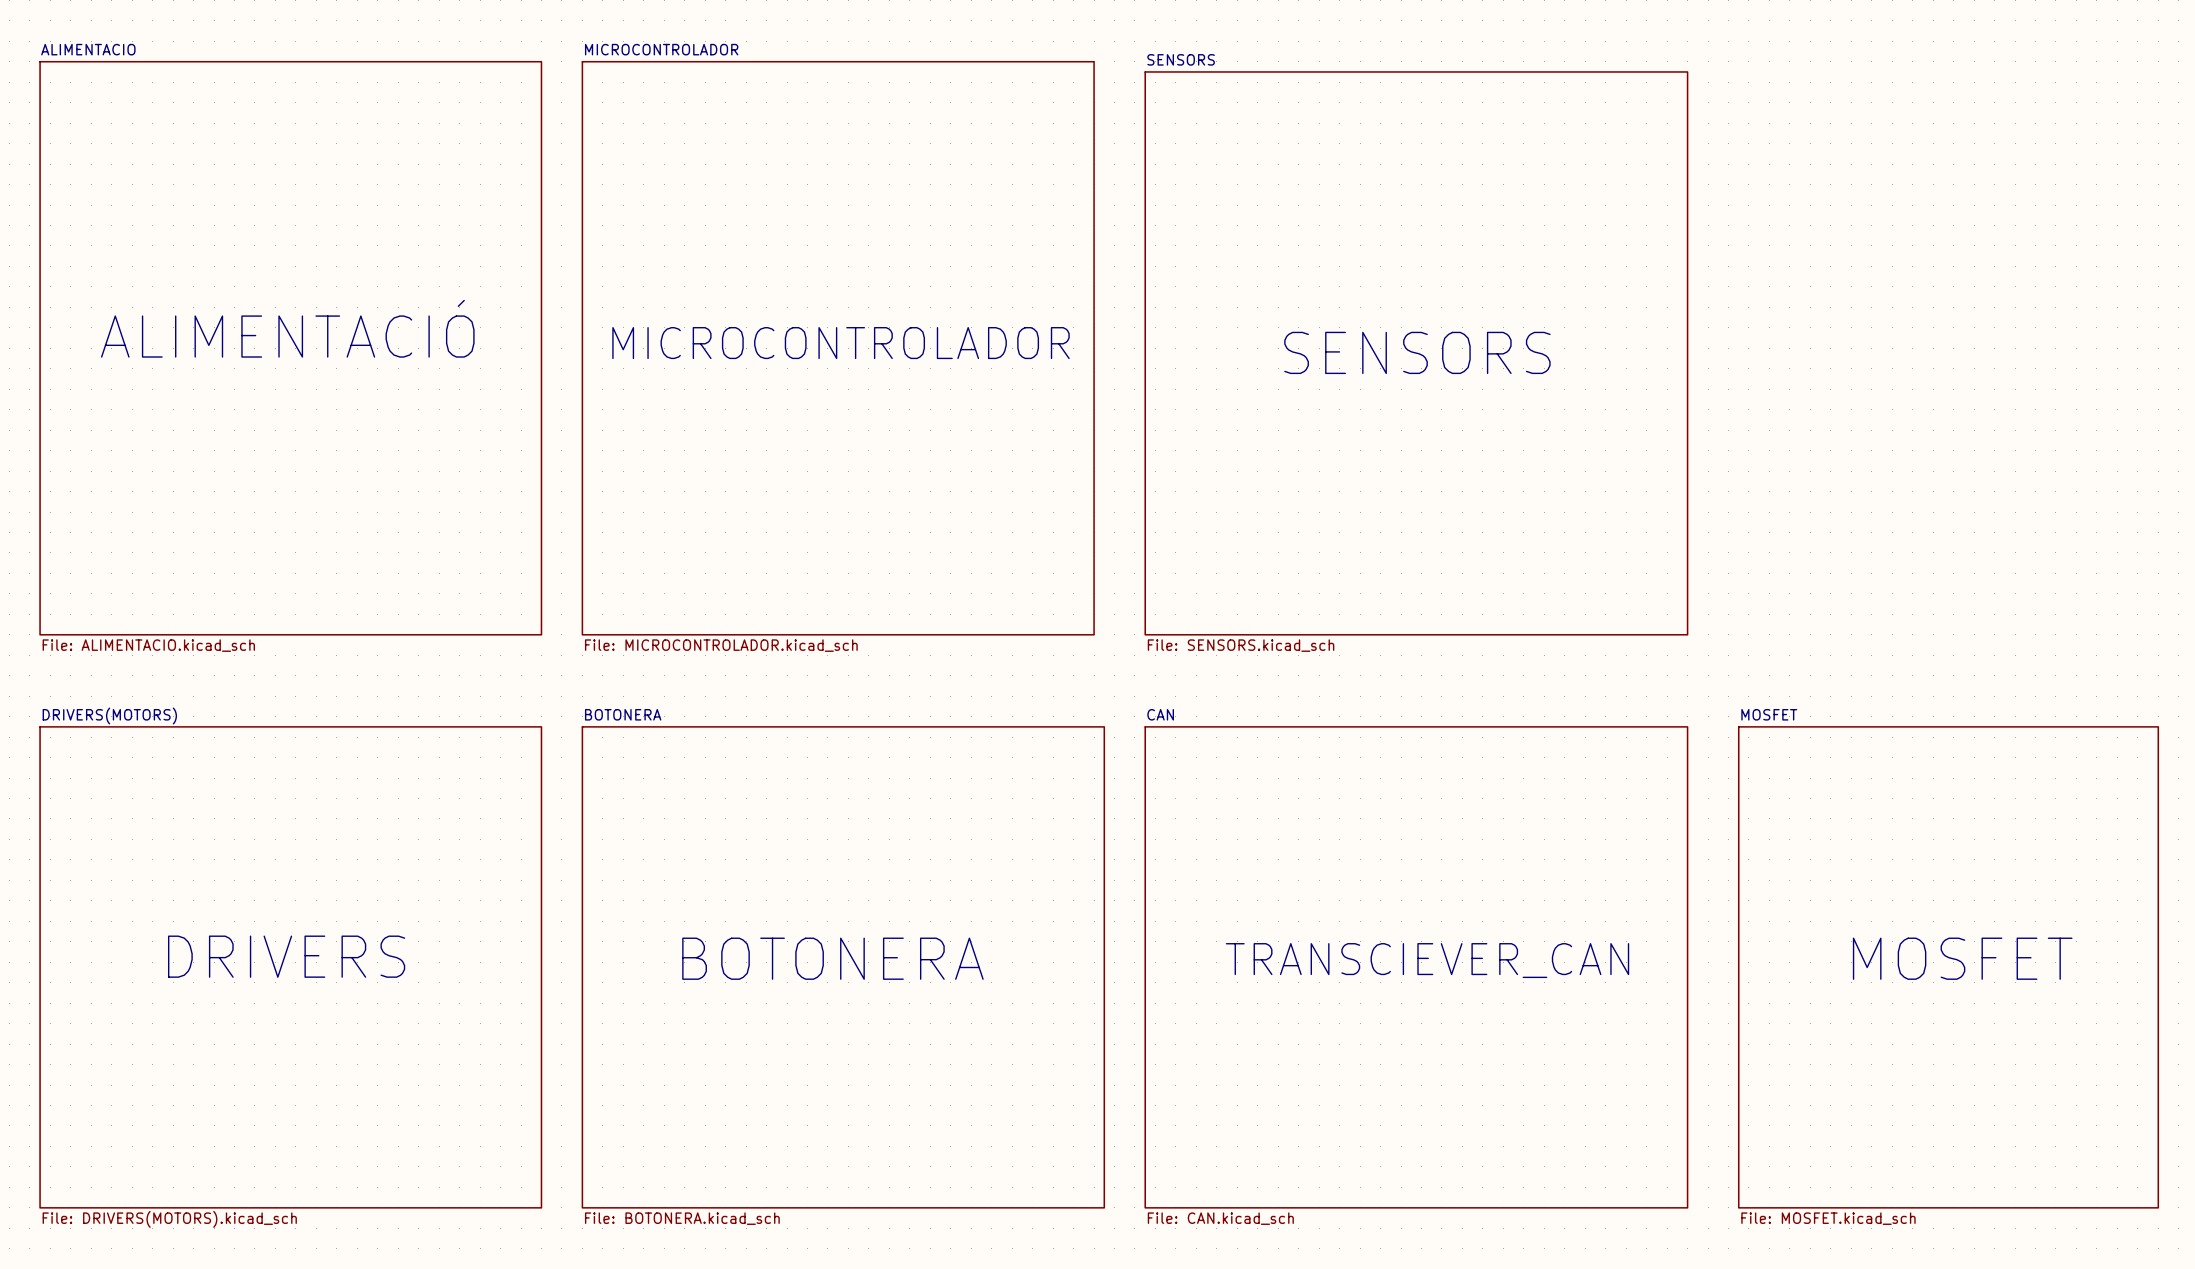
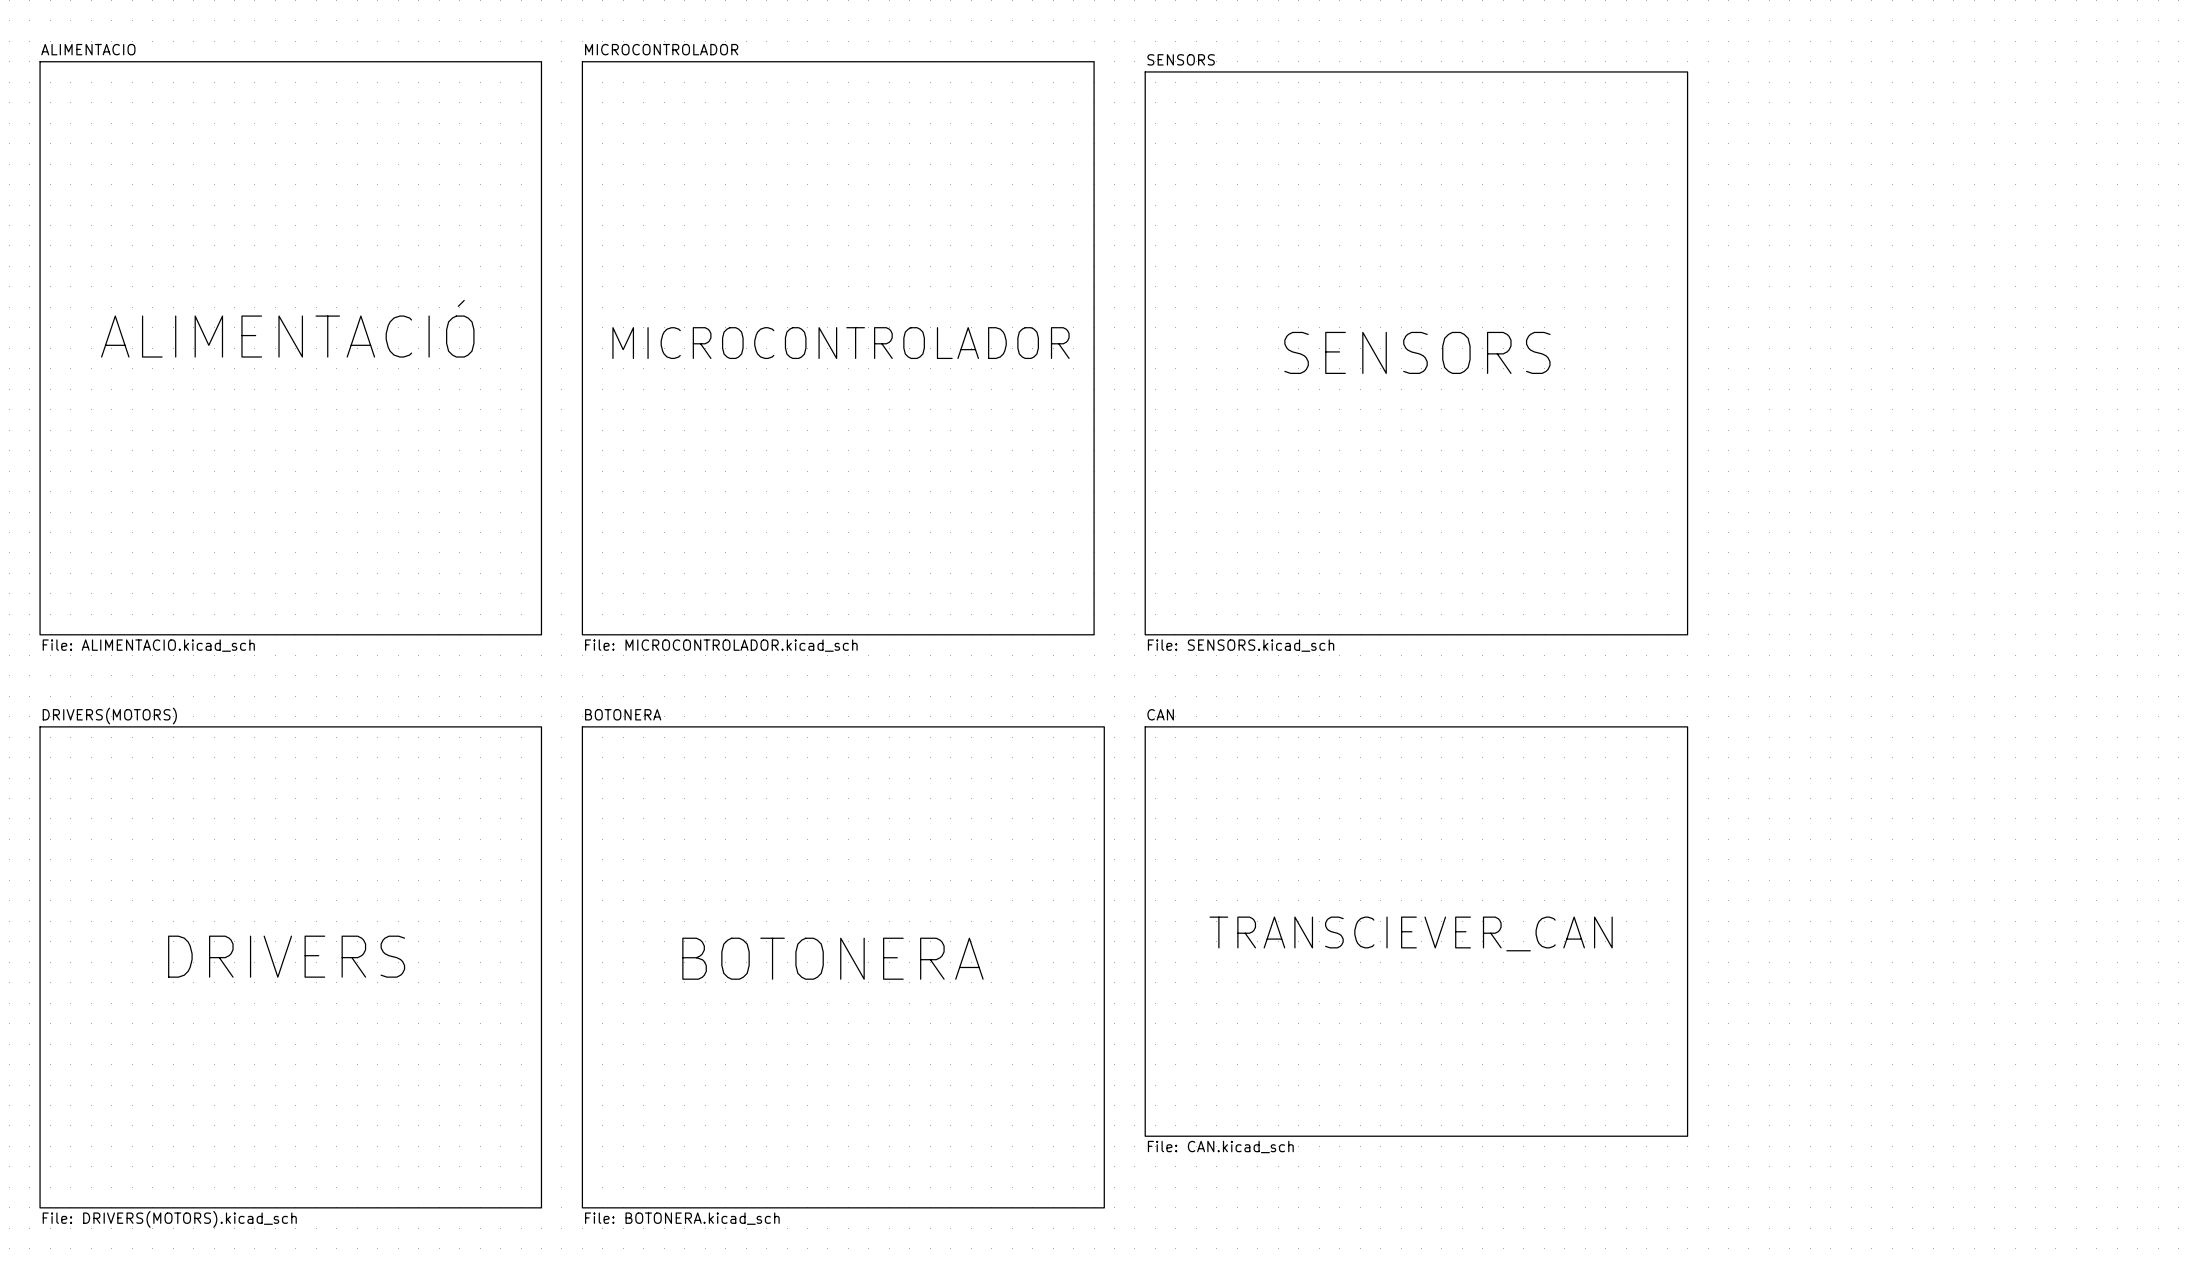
sheet CAN: none -> File: CAN.kicad_sch (1416, 931)
text: MOSFET (1962, 958) -> none
text position: TRANSCIEVER_CAN (1427, 960) -> TRANSCIEVER_CAN (1411, 933)
sheet CAN: File: CAN.kicad_sch (1416, 967) -> none
sheet MOSFET: File: MOSFET.kicad_sch (1948, 967) -> none

